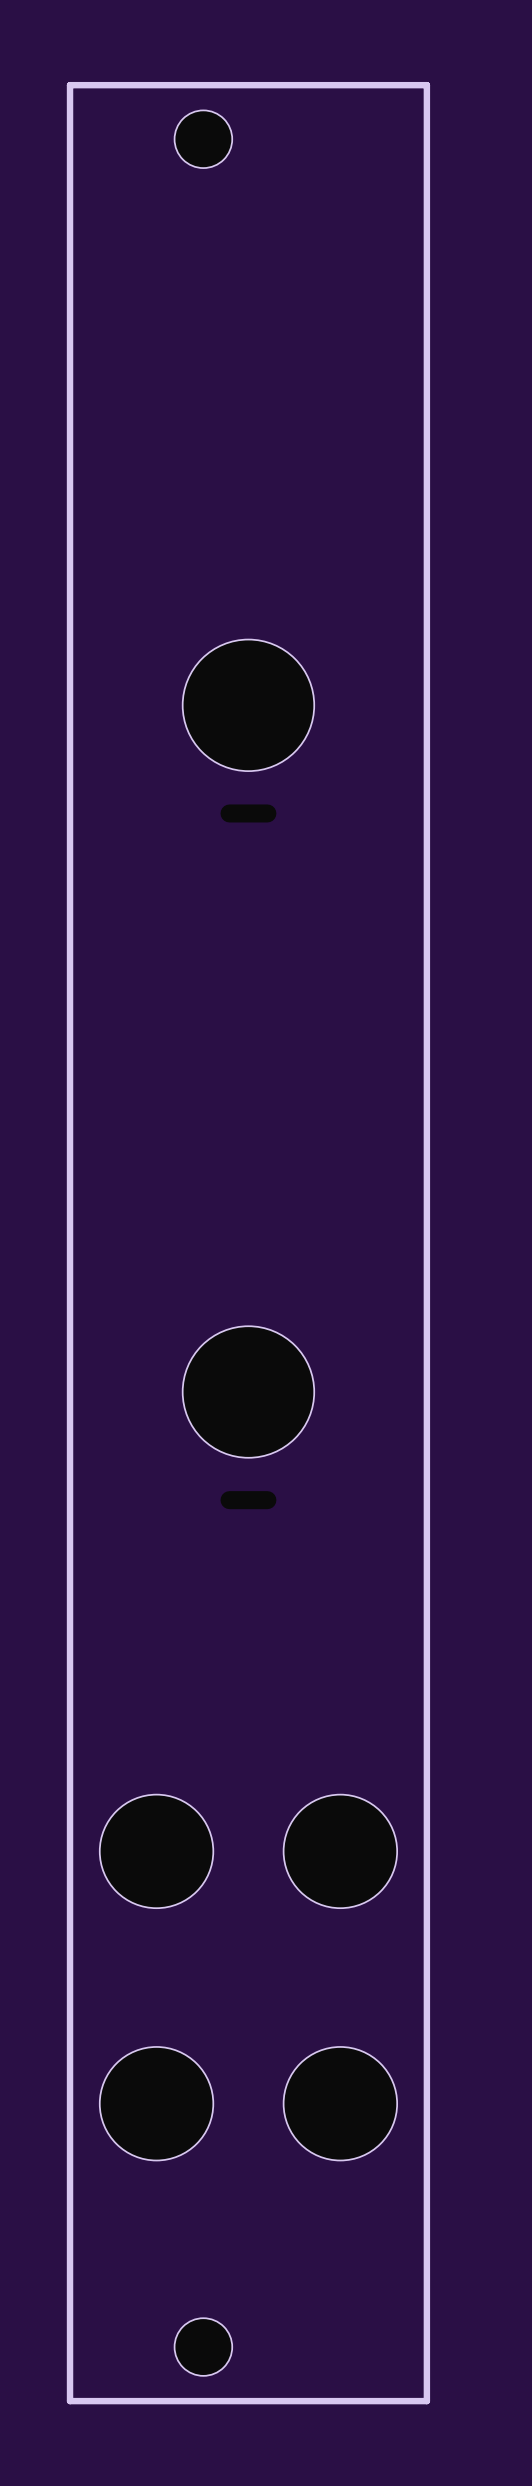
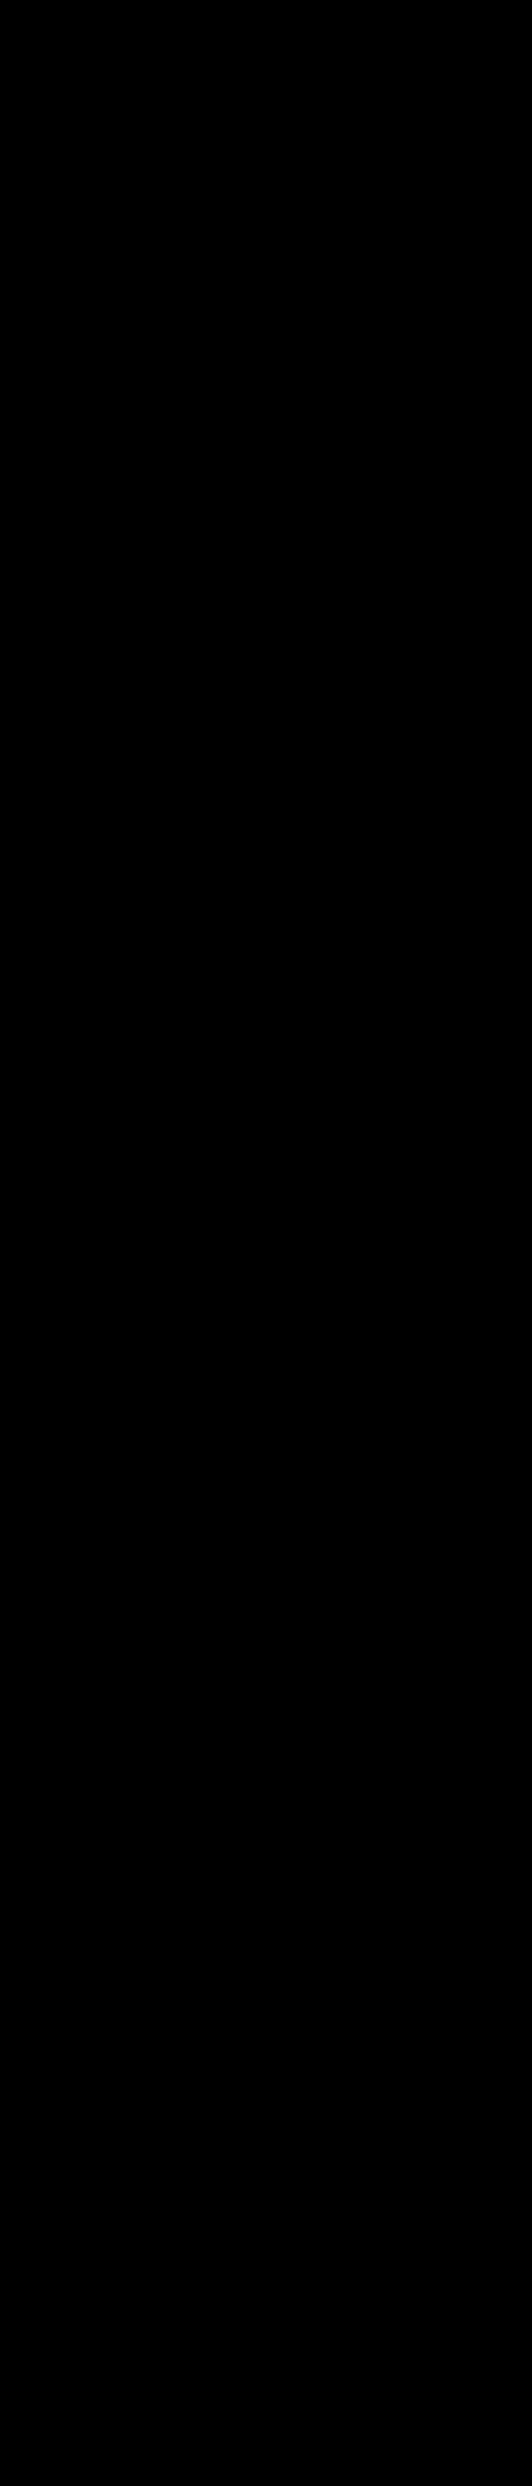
board edge: (70, 85) (70, 2401) (426, 2401) (426, 85) (70, 85) -> none
part: (203, 139) -> none
part: (248, 731) -> none
part: (248, 1417) -> none
part: (156, 1851) -> none
part: (340, 1851) -> none
part: (156, 2103) -> none
part: (340, 2103) -> none
part: (203, 2347) -> none

